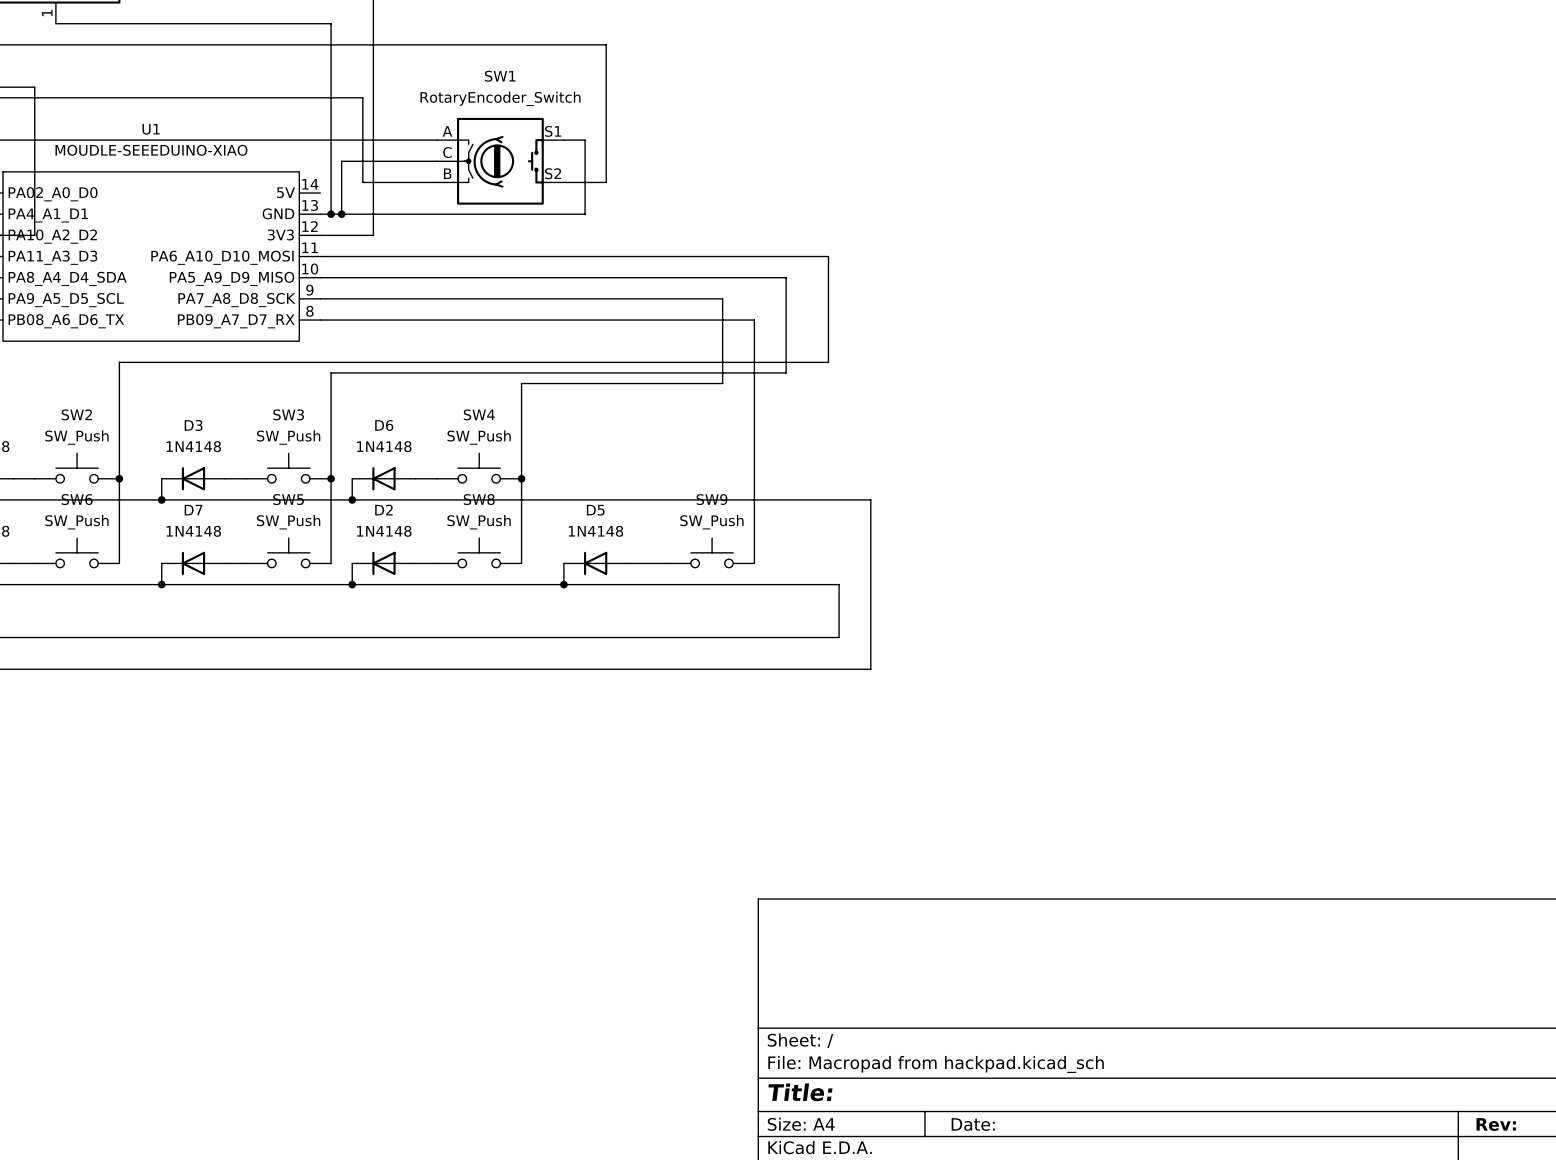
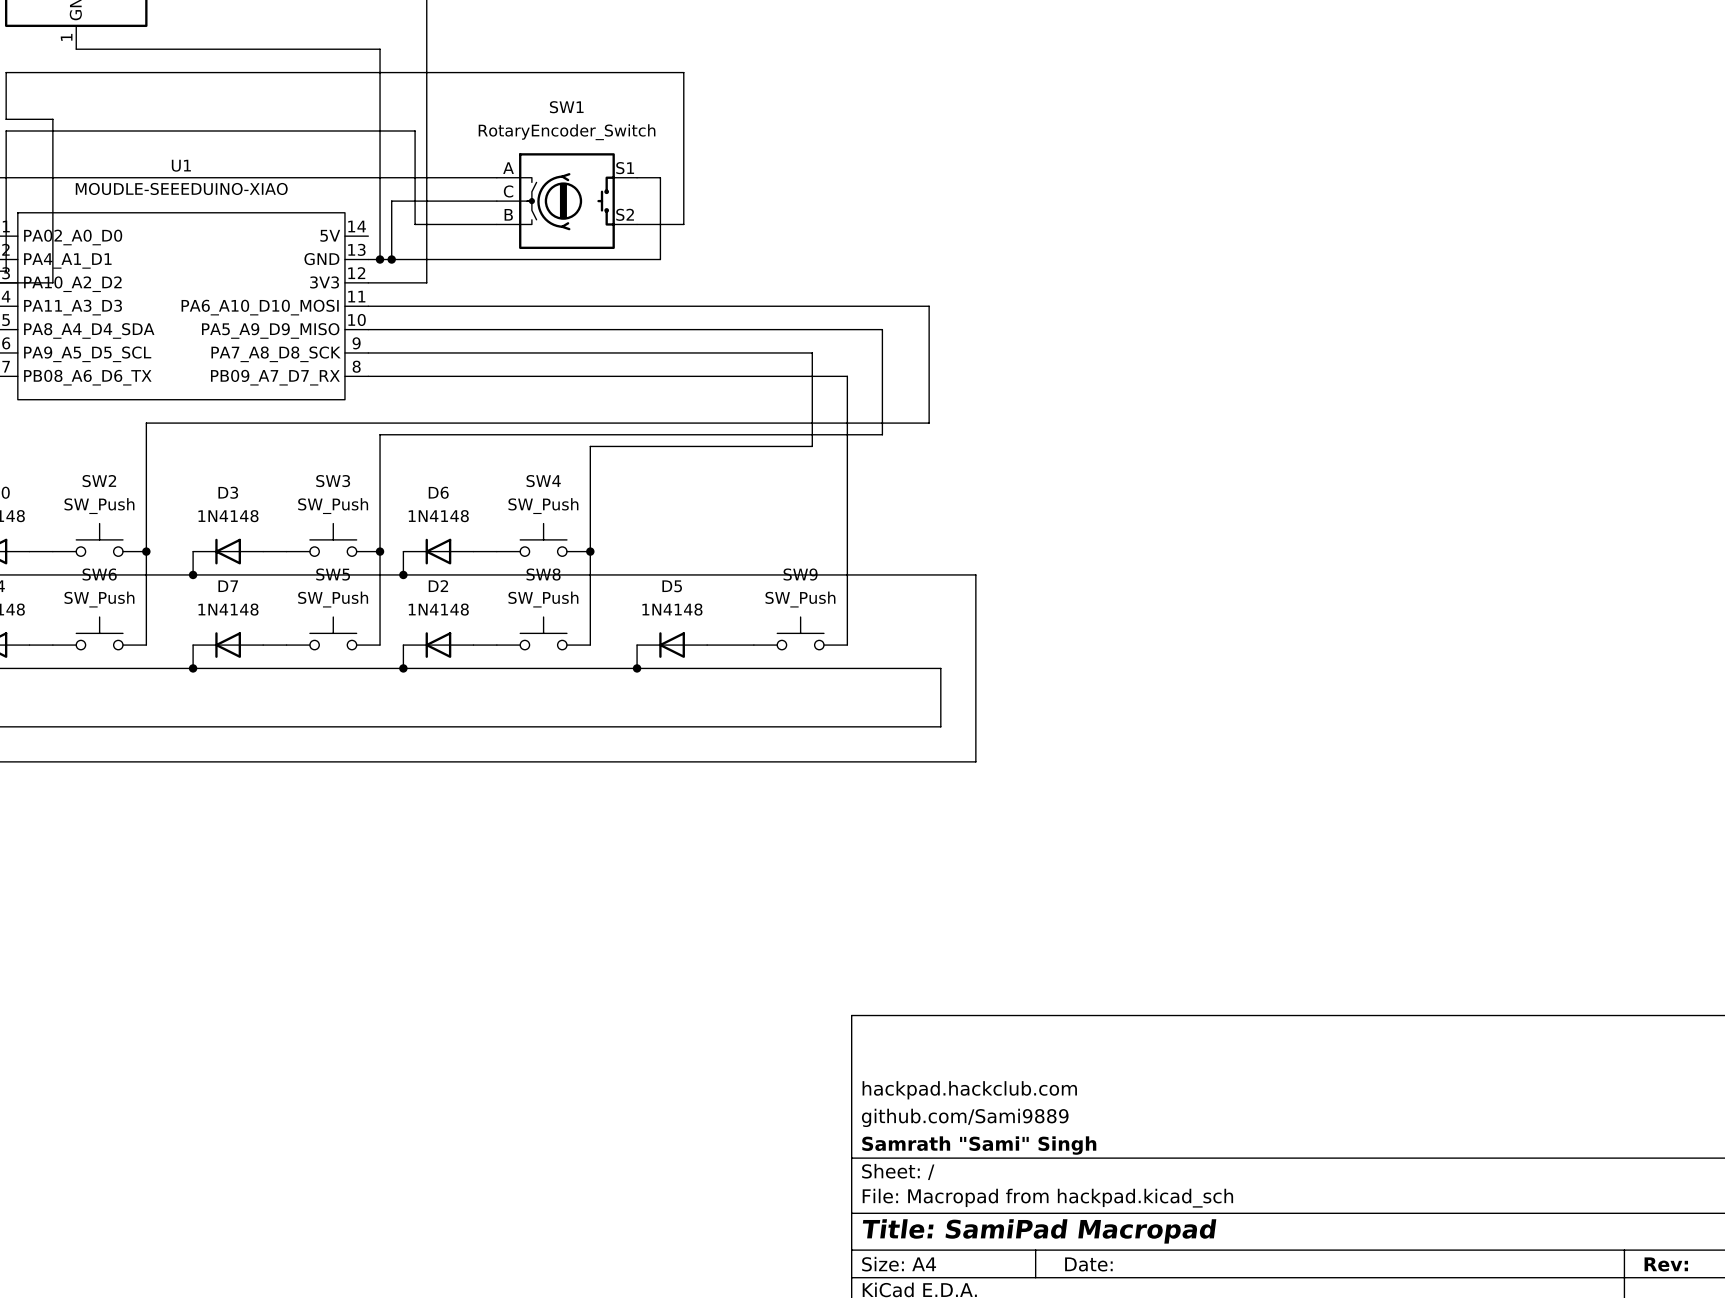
title block: none -> hackpad.hackclub.com (969, 1090)
title block: none -> github.com/Sami9889 (965, 1117)
title block: none -> Samrath "Sami" Singh (979, 1145)
title block: Title: (800, 1092) -> Title: SamiPad Macropad (1039, 1231)

